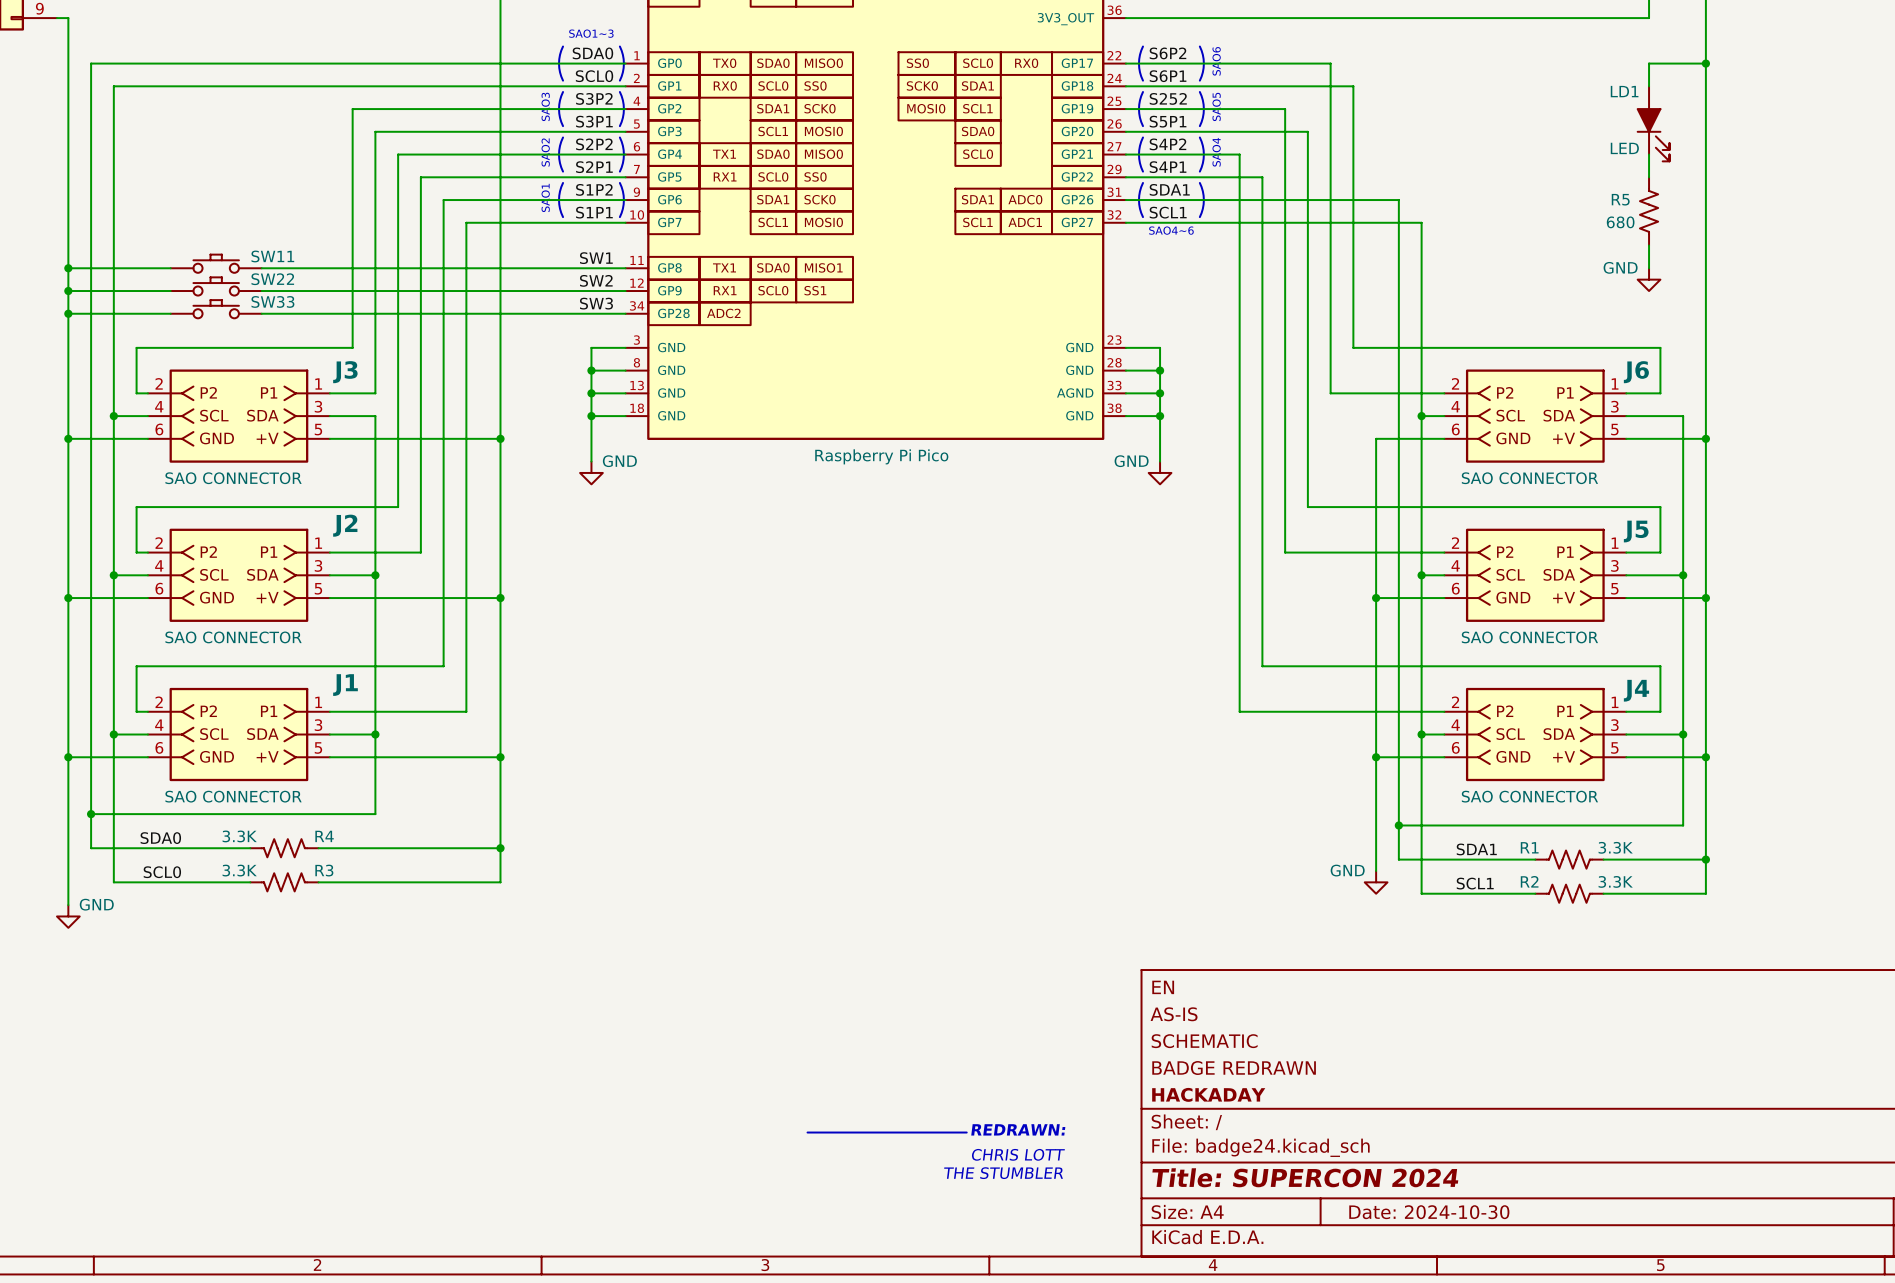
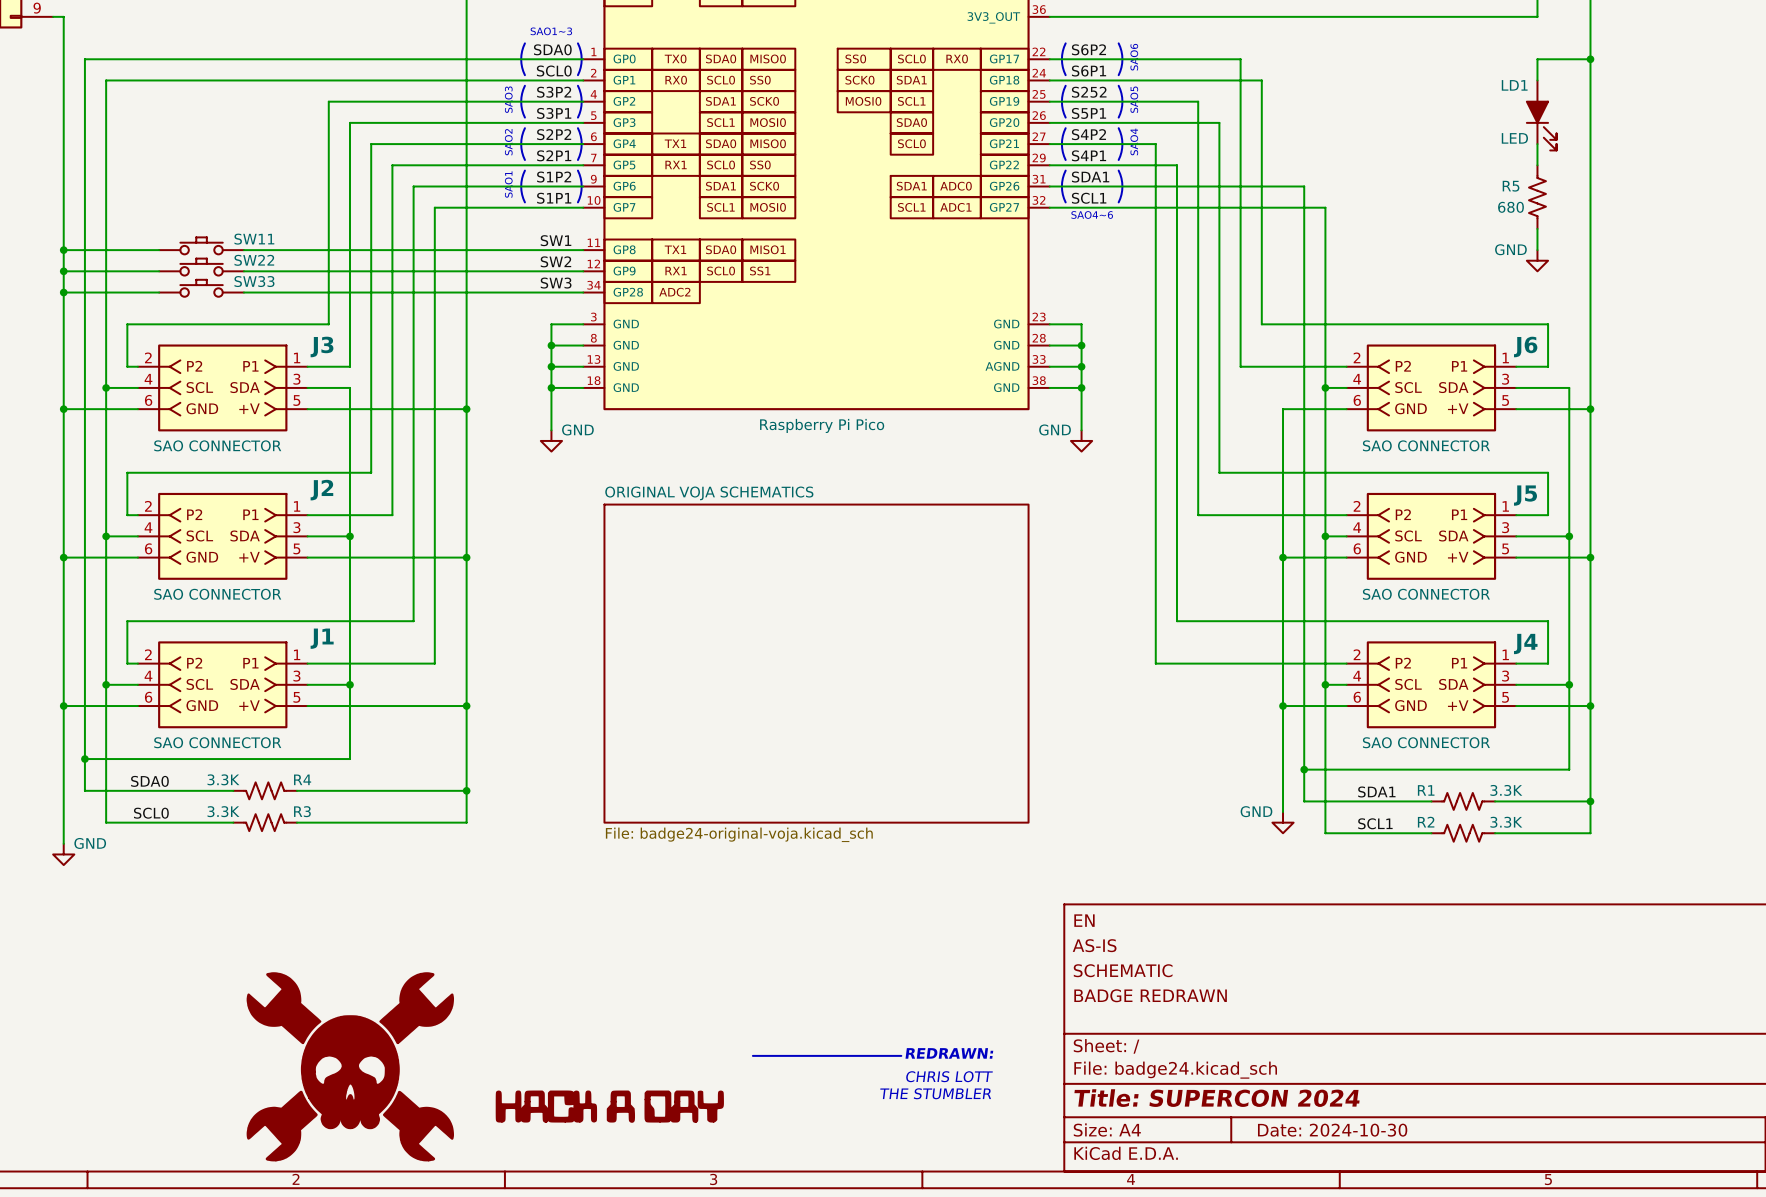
sheet ORIGINAL VOJA SCHEMATICS: none -> File: badge24-original-voja.kicad_sch (816, 663)
title block: HACKADAY (1208, 1094) -> none
power symbol: none -> (350, 1066)
power symbol: none -> (609, 1106)

